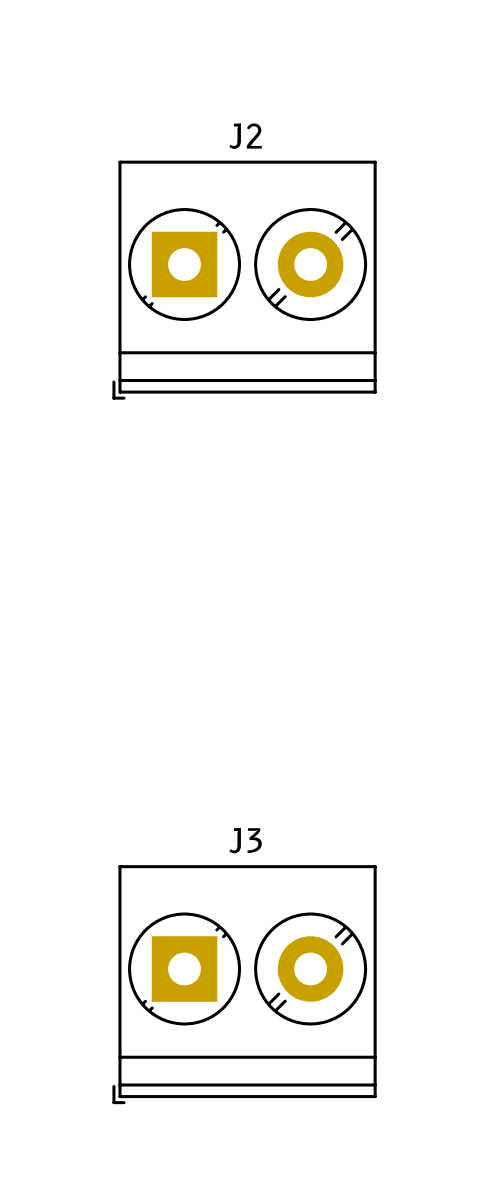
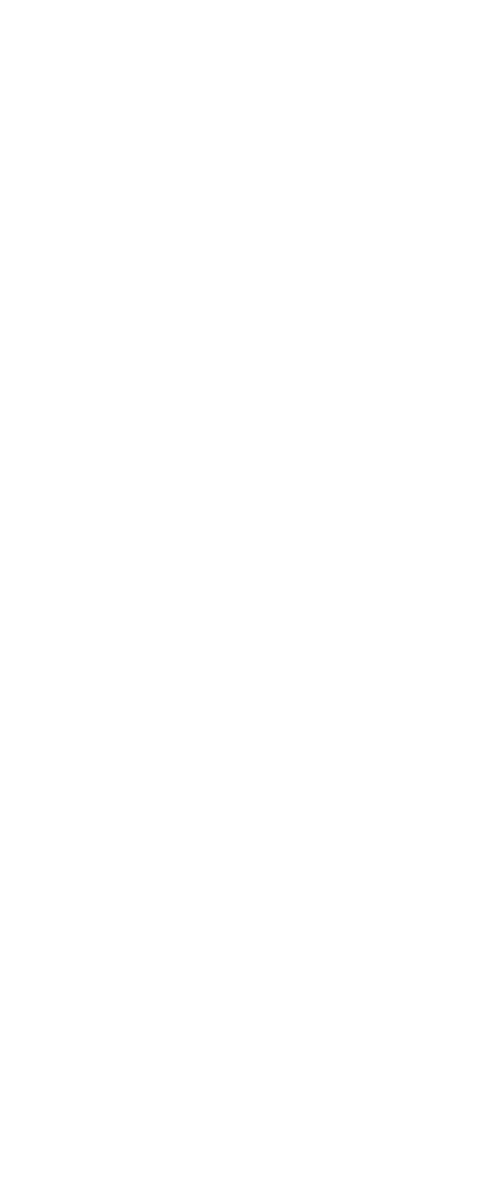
J2: (244, 280) -> none
J3: (244, 984) -> none

